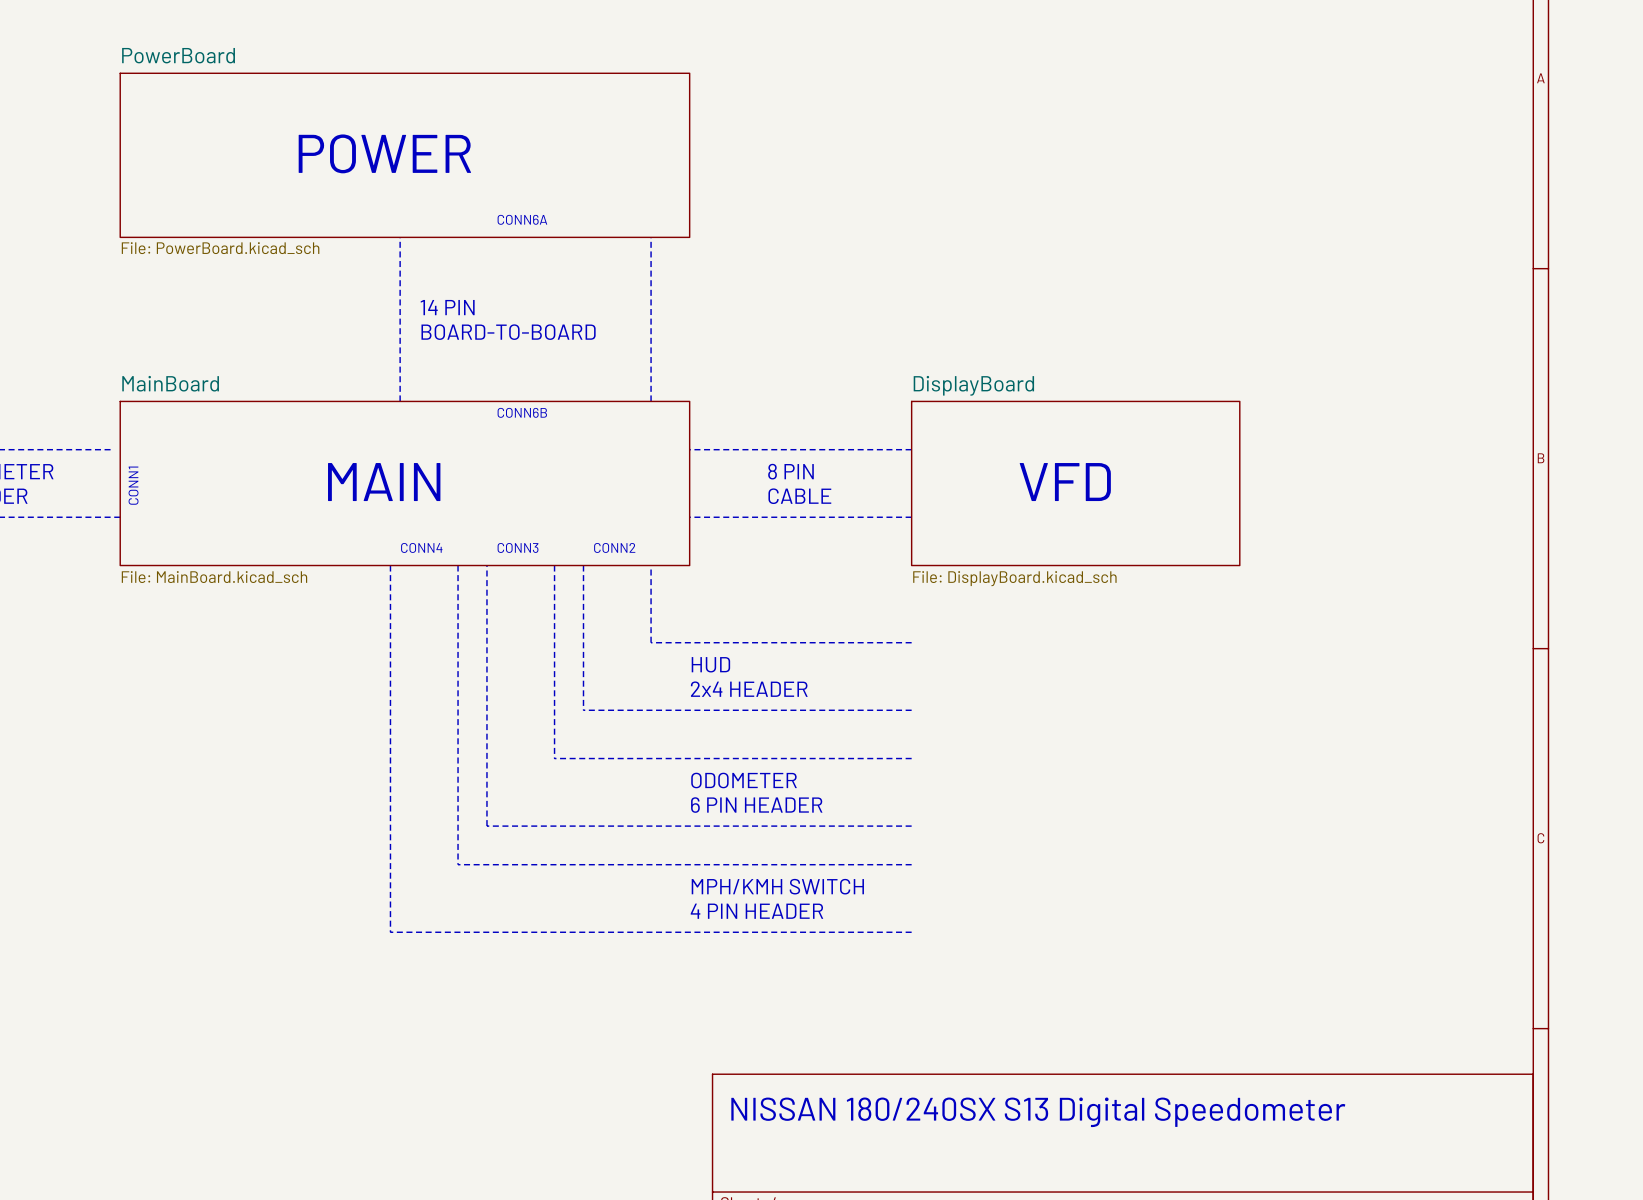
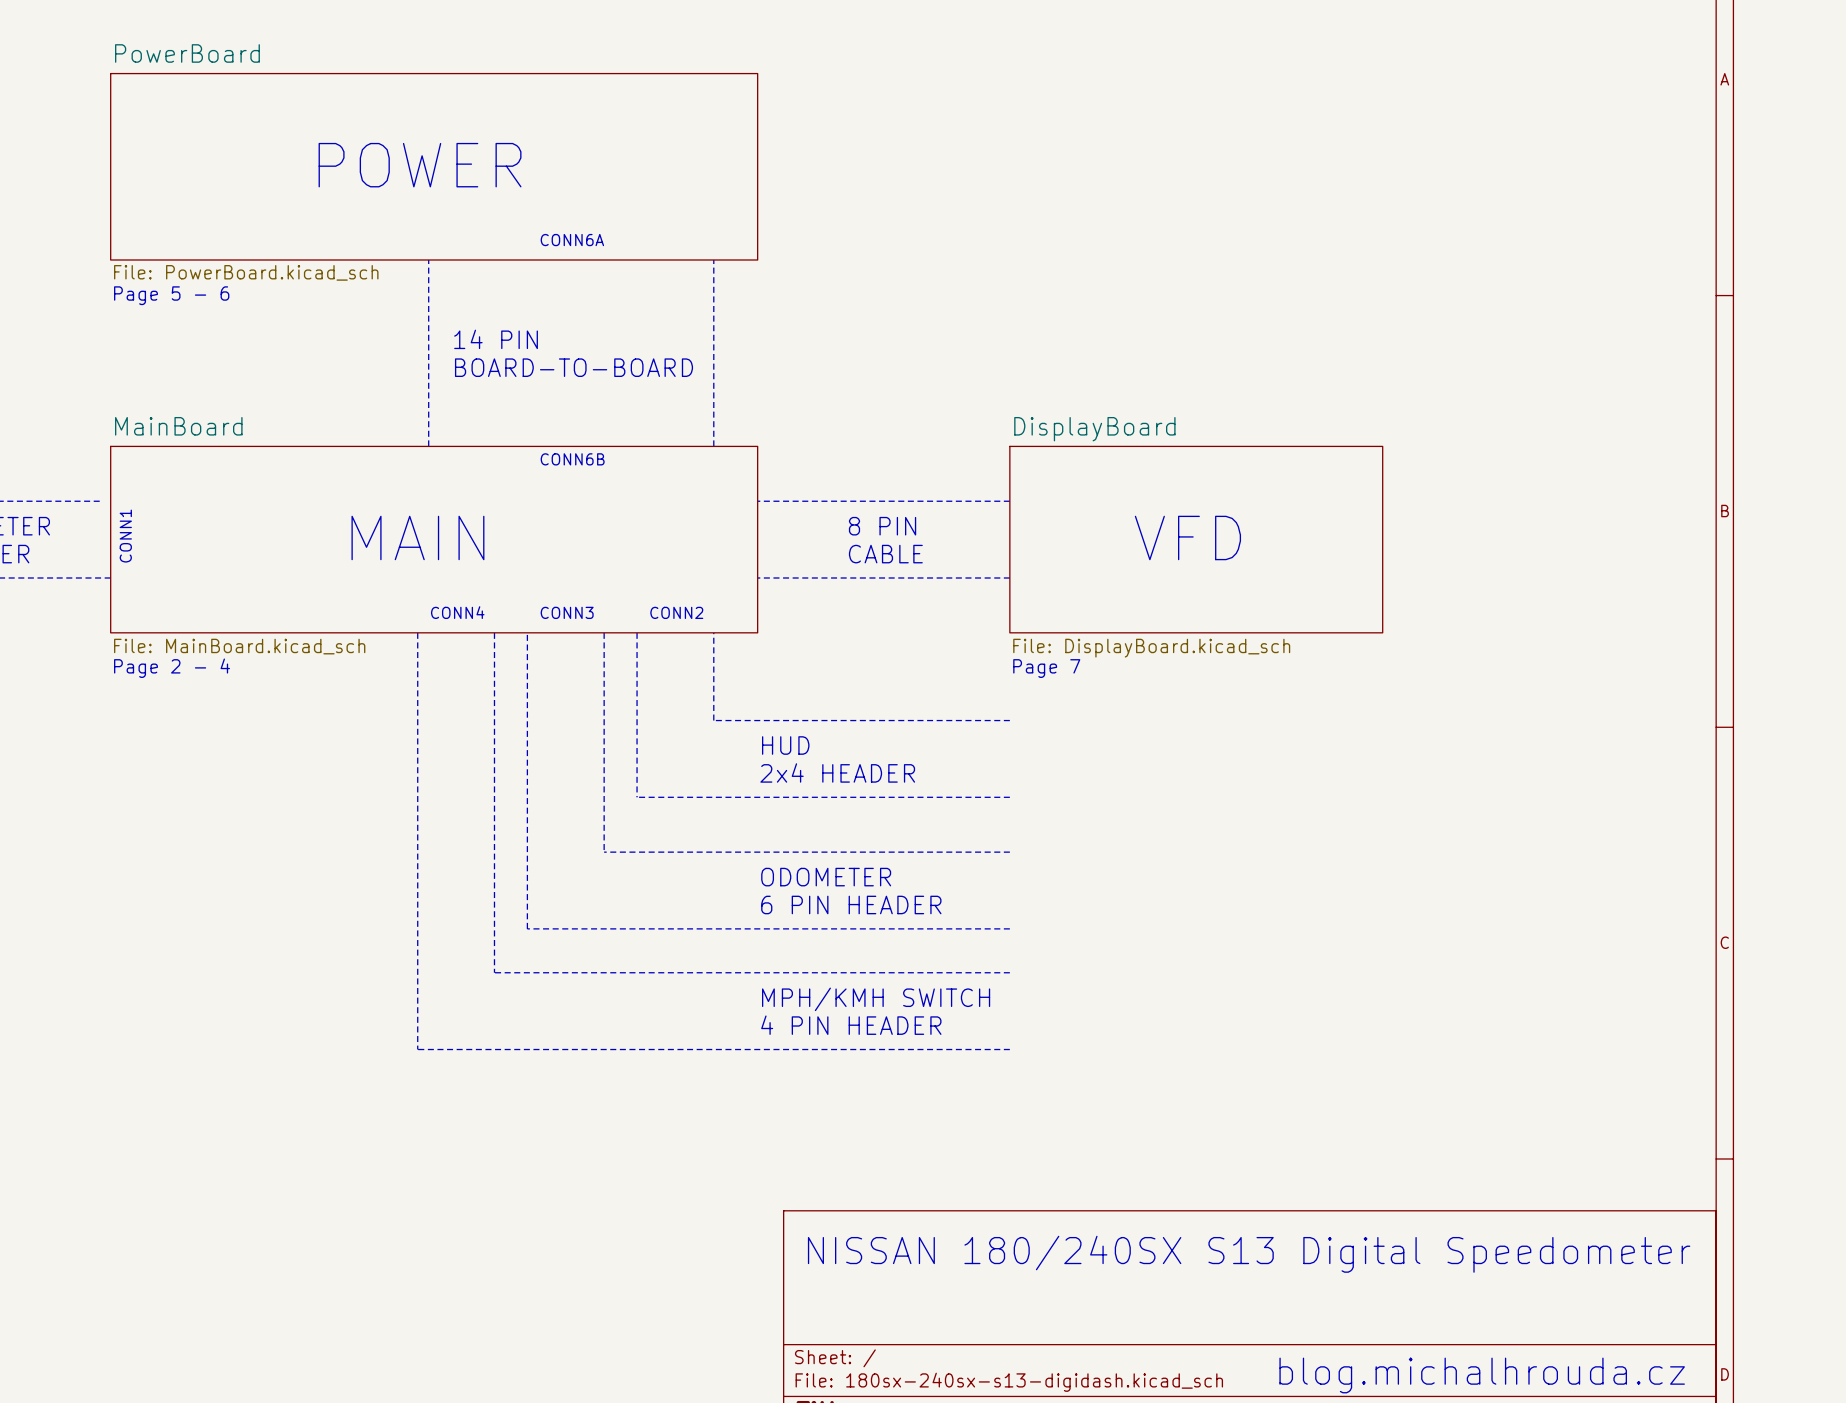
text: none -> Page 5 - 6 (171, 295)
text: none -> Page 2 - 4 (172, 668)
text: none -> Page 7 (1046, 668)

